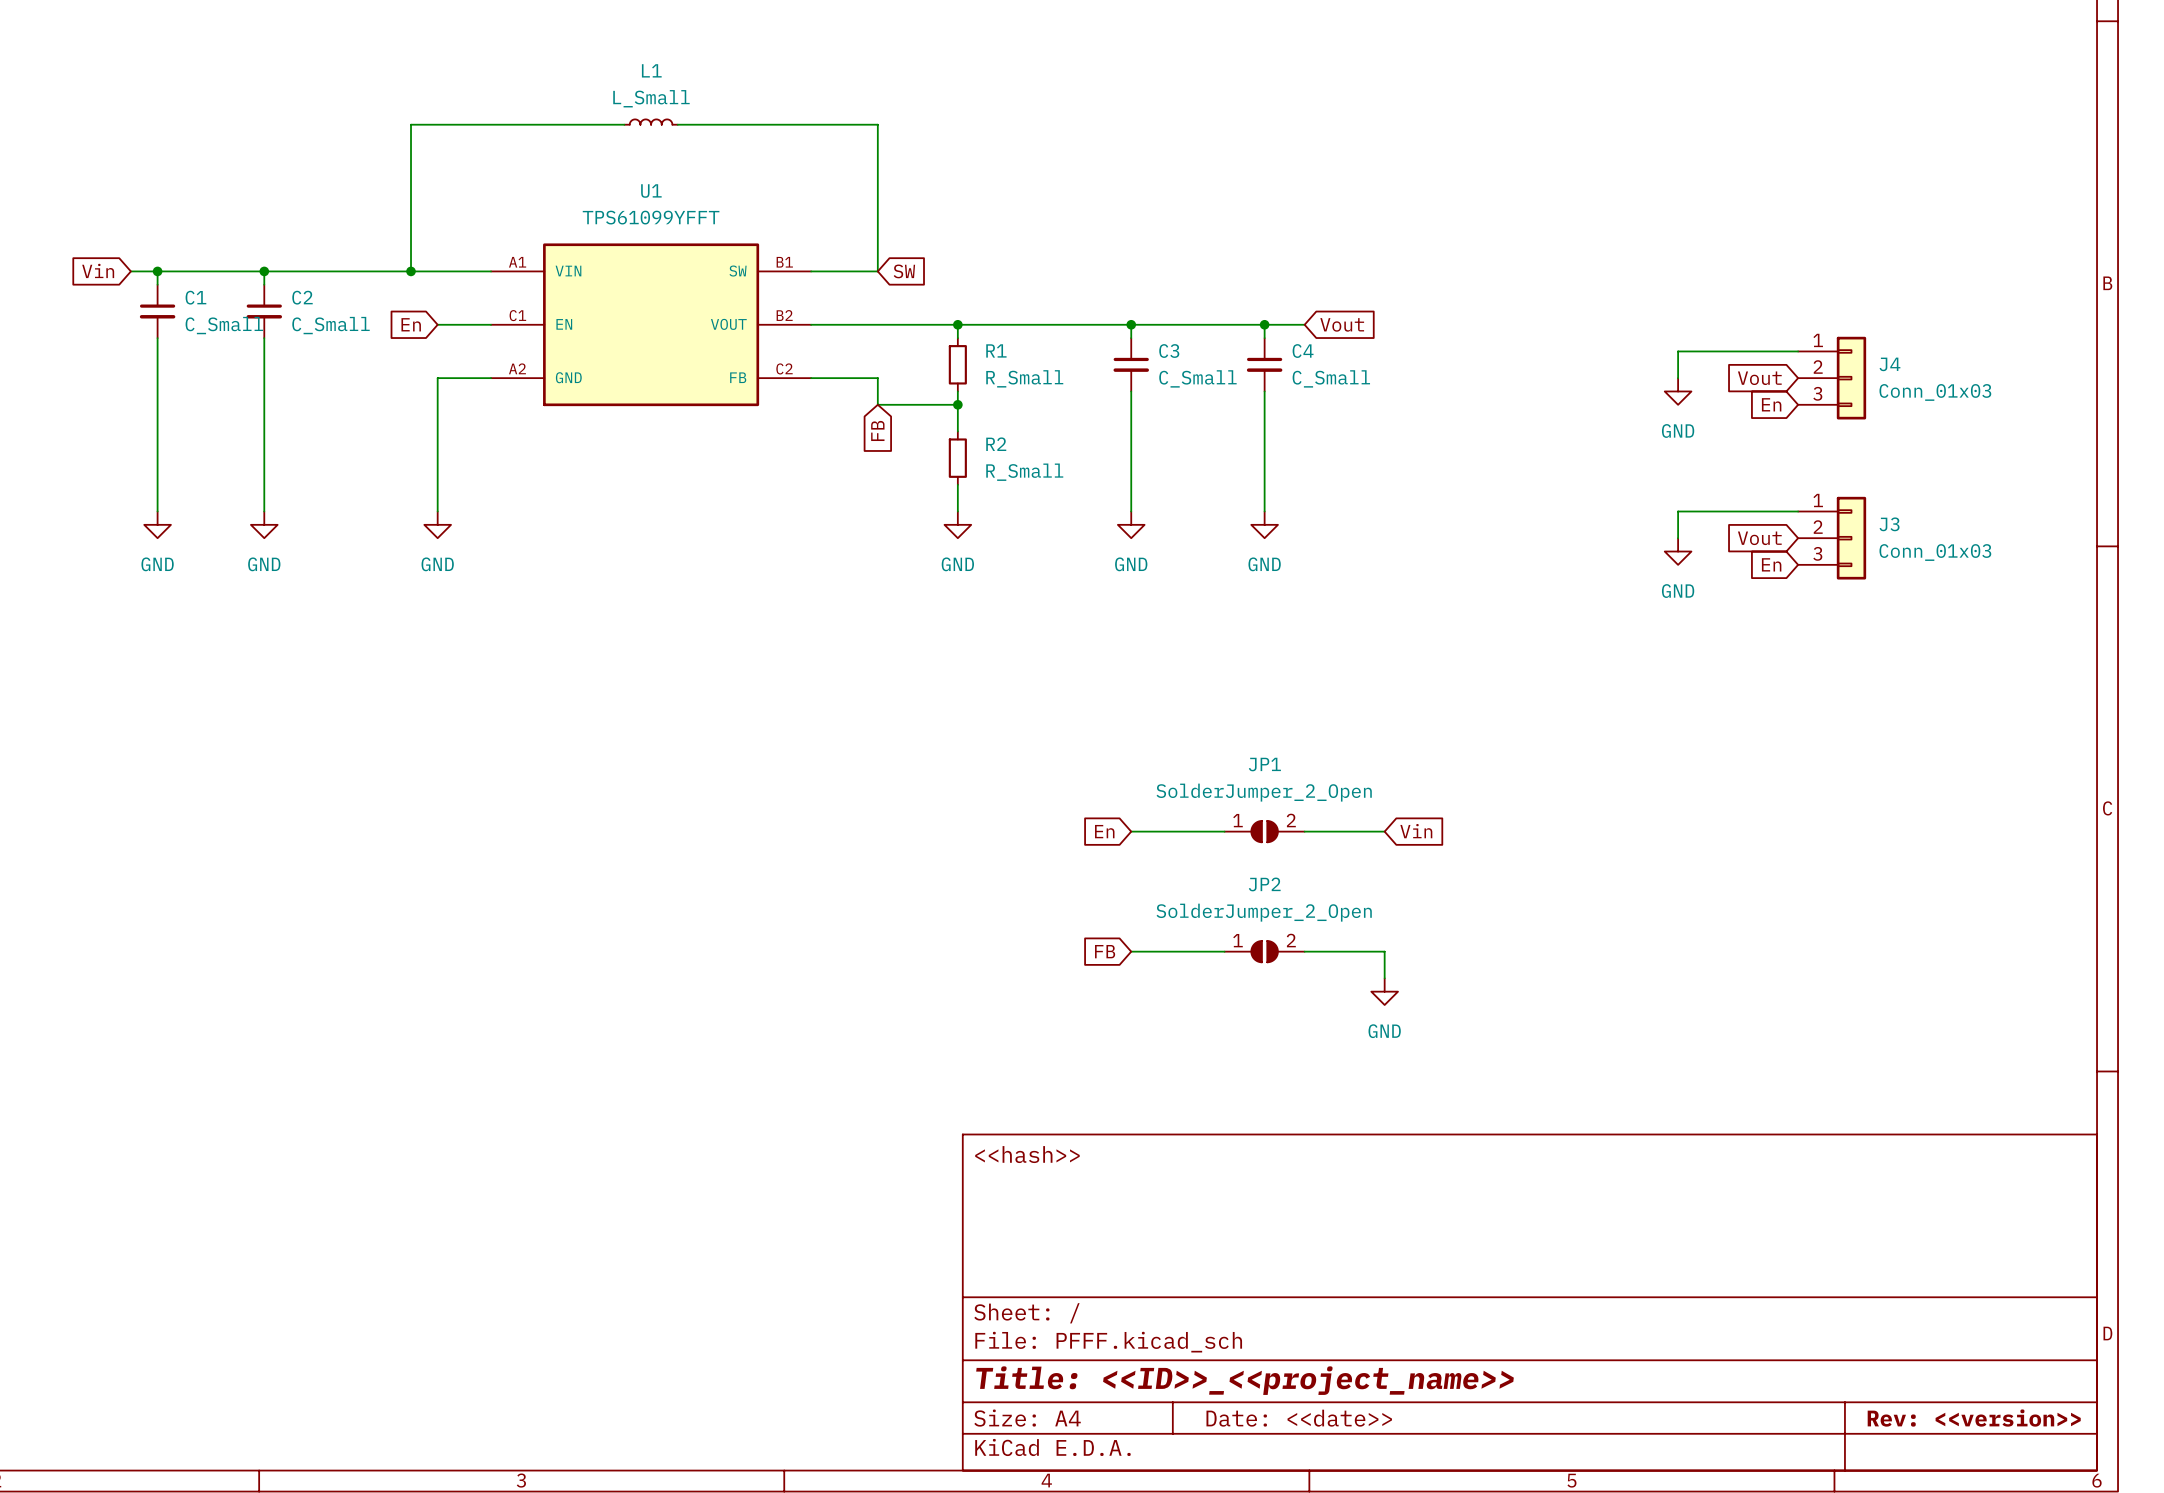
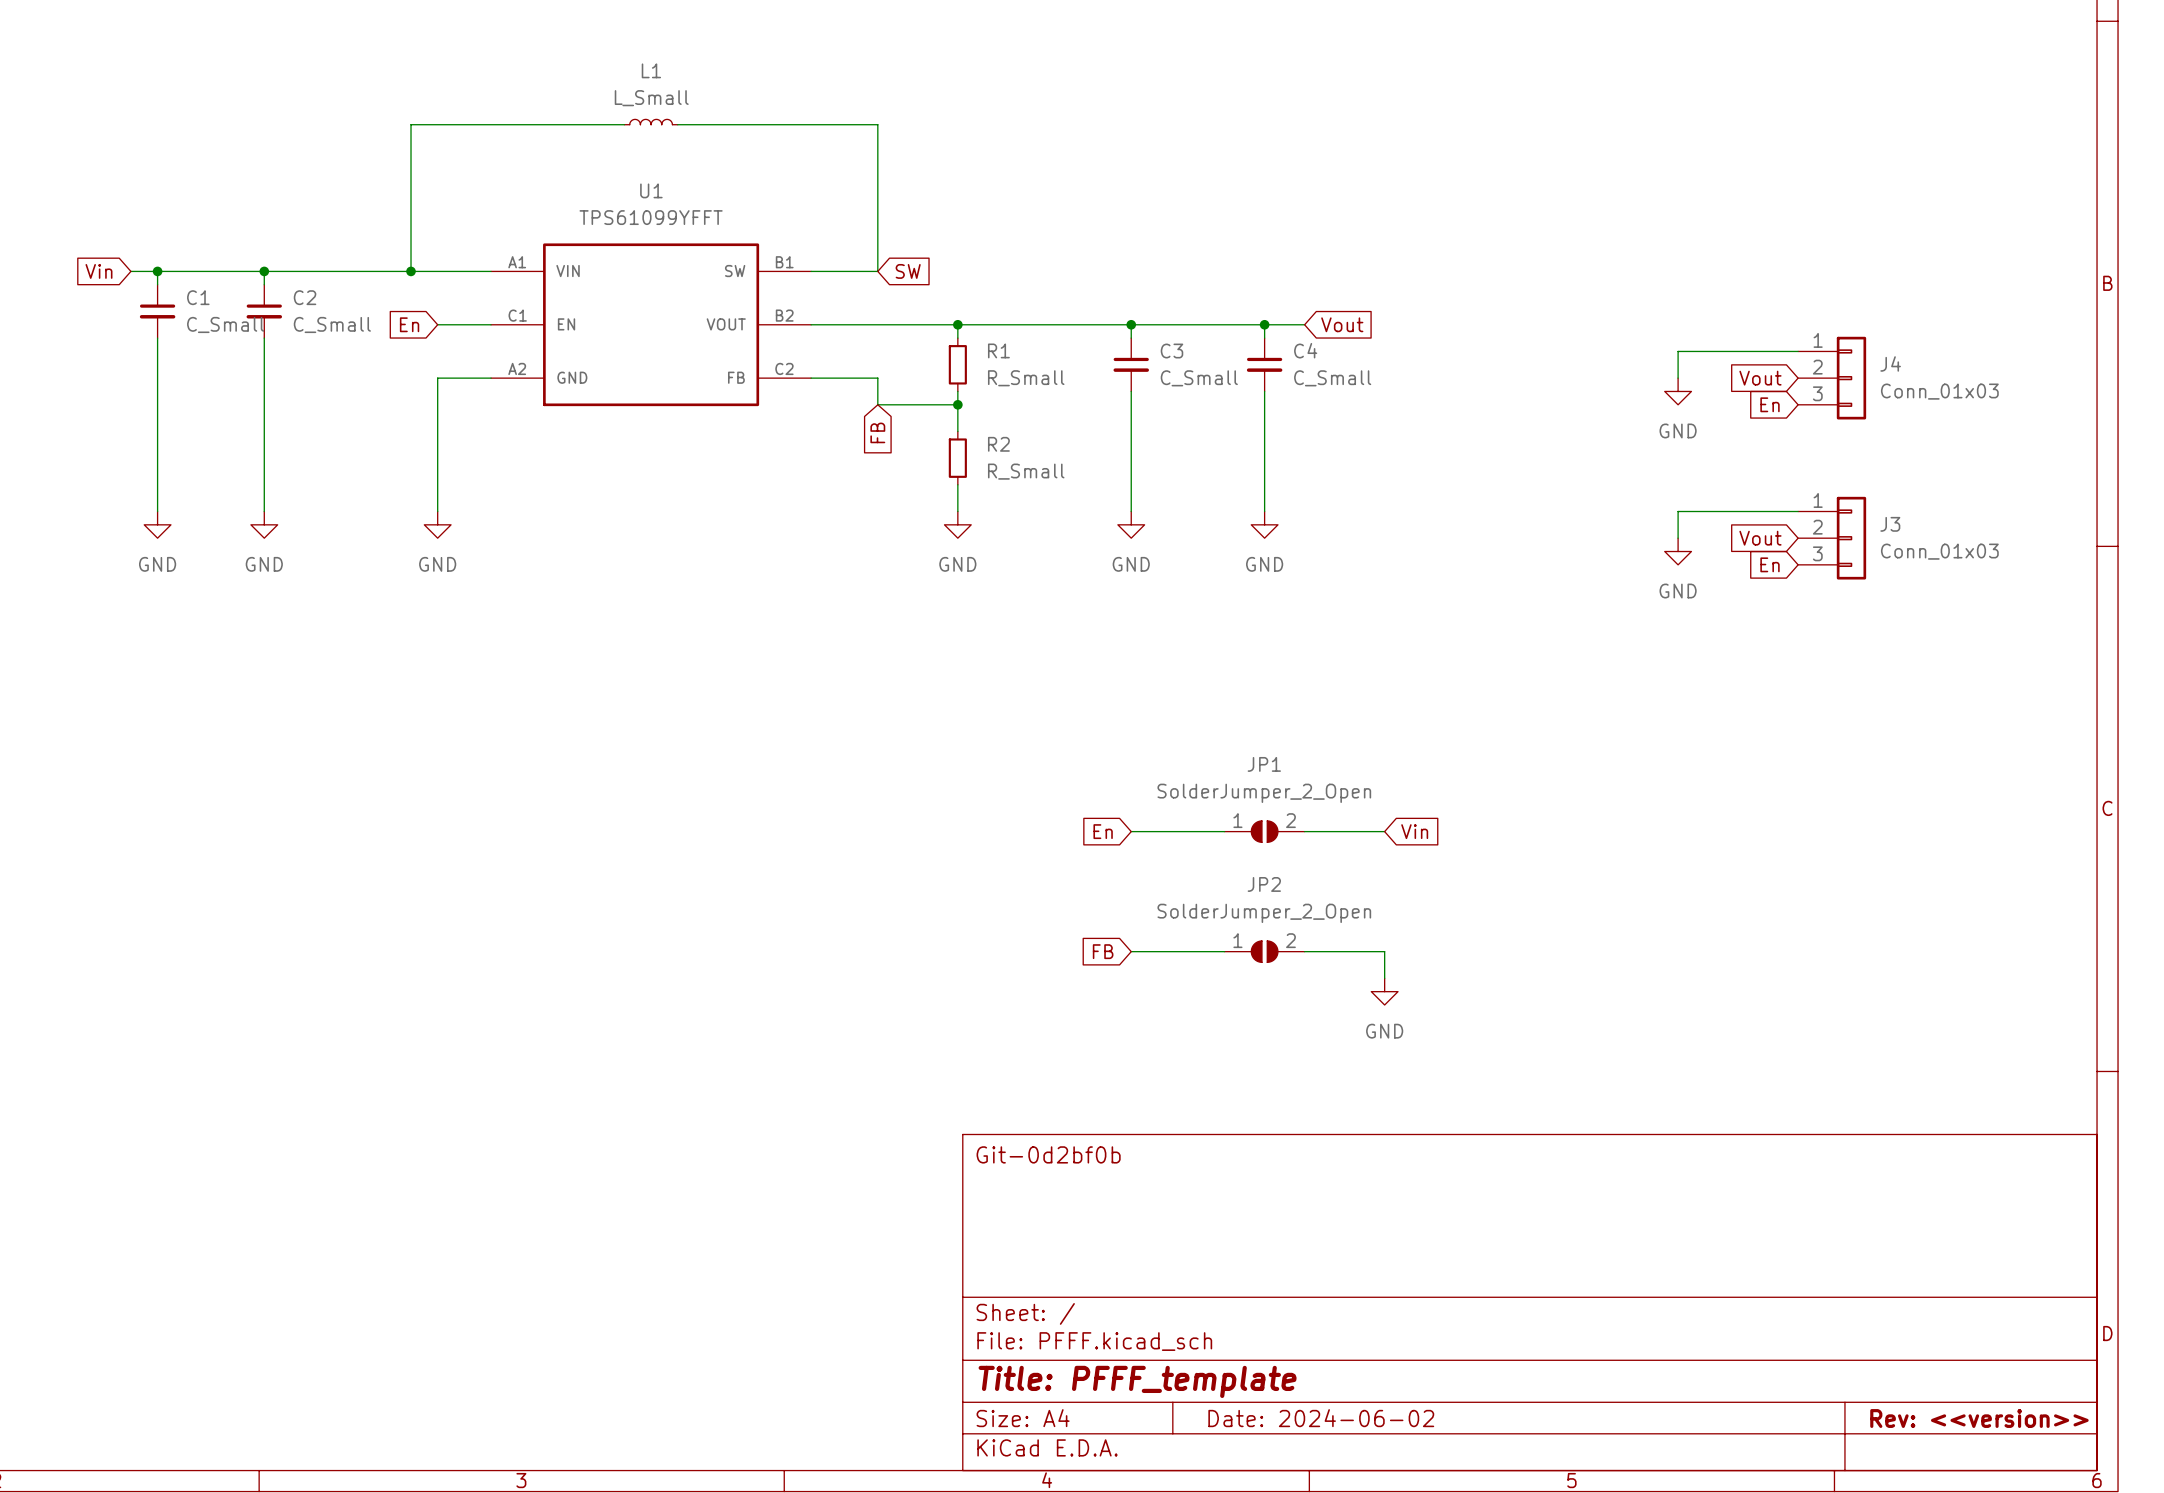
title block: <<hash>> (1027, 1154) -> Git-0d2bf0b (1048, 1154)
title block: Title: <<ID>>_<<project_name>> (1245, 1380) -> Title: PFFF_template (1137, 1381)
title block: Date: <<date>> (1299, 1418) -> Date: 2024-06-02 (1321, 1418)

